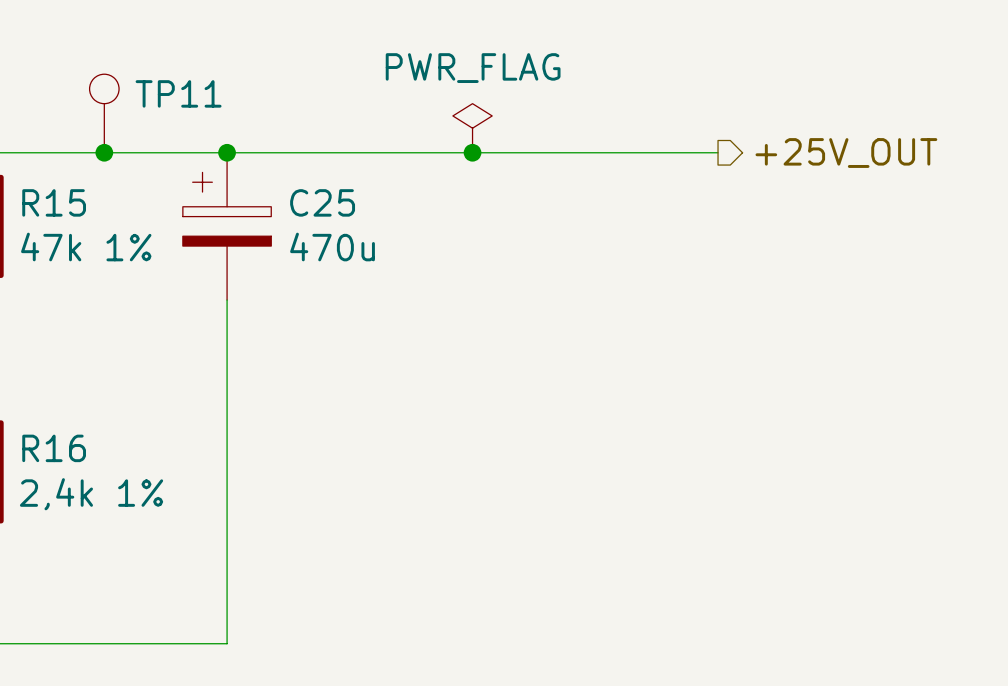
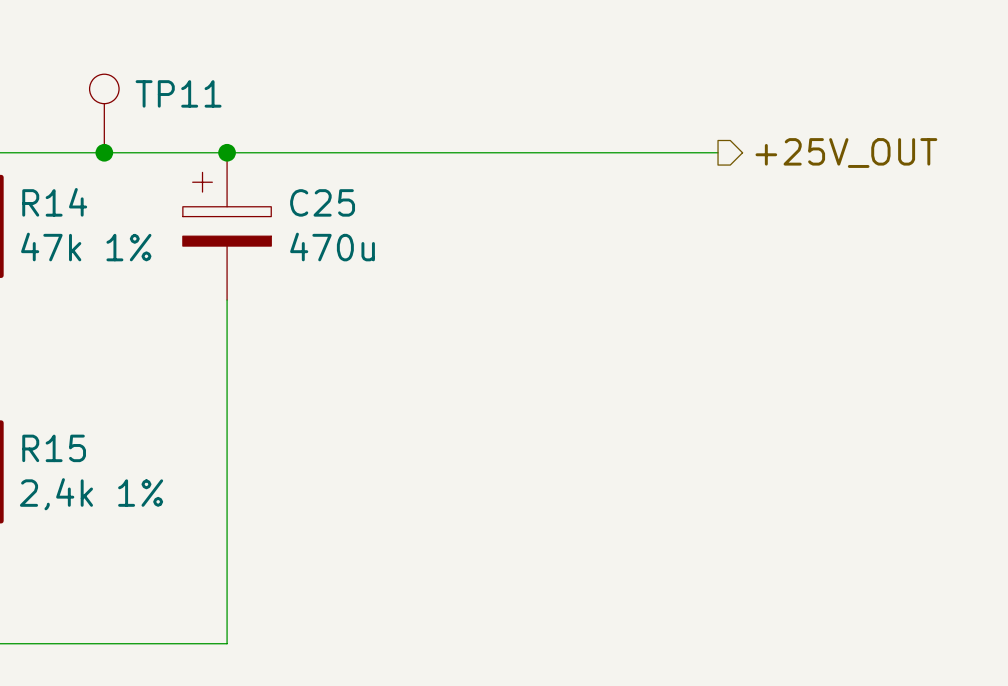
power symbol: PWR_FLAG (472, 128) -> none
junction: (472, 152) -> none
R15 name: R15 (54, 202) -> R14 (54, 202)
R16 name: R16 (54, 448) -> R15 (54, 448)

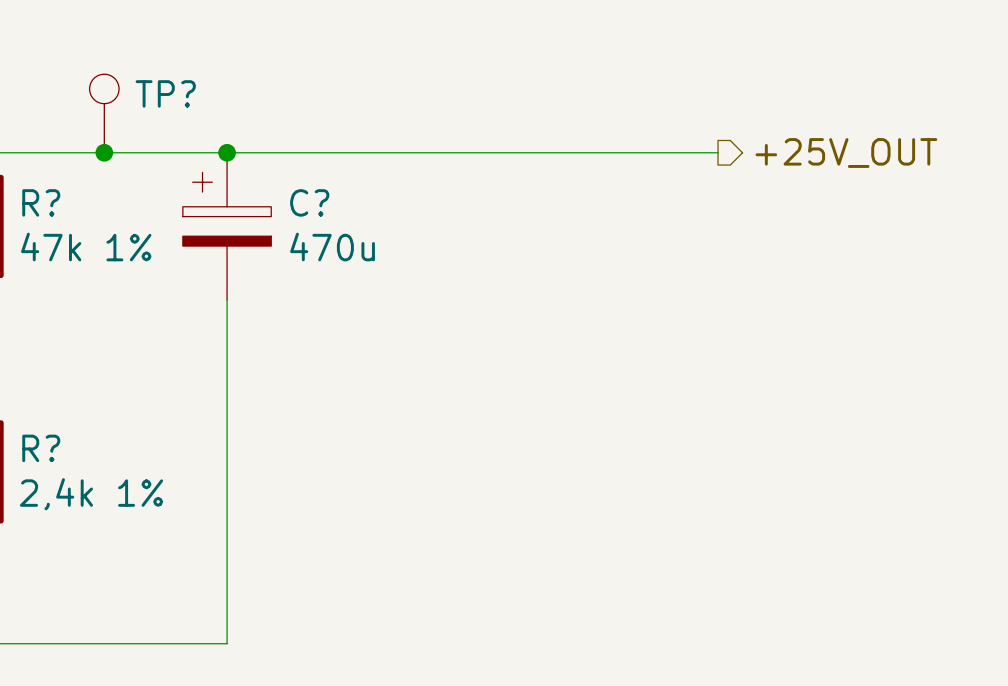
TP11 name: TP11 (178, 93) -> TP? (165, 93)
R14 name: R14 (54, 202) -> R? (41, 202)
C25 name: C25 (322, 202) -> C? (309, 202)
R15 name: R15 (54, 448) -> R? (41, 448)

